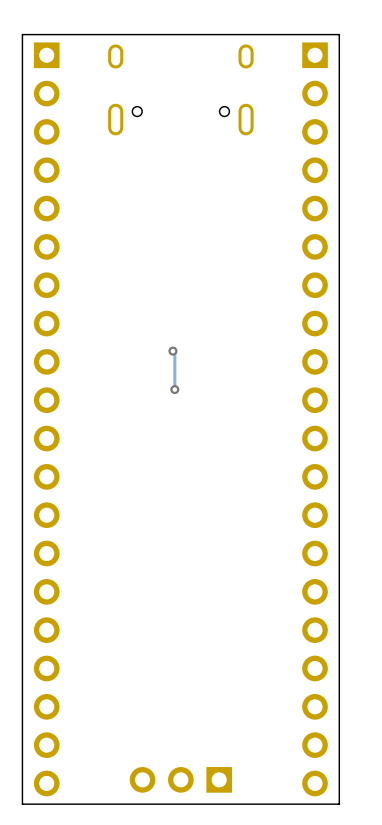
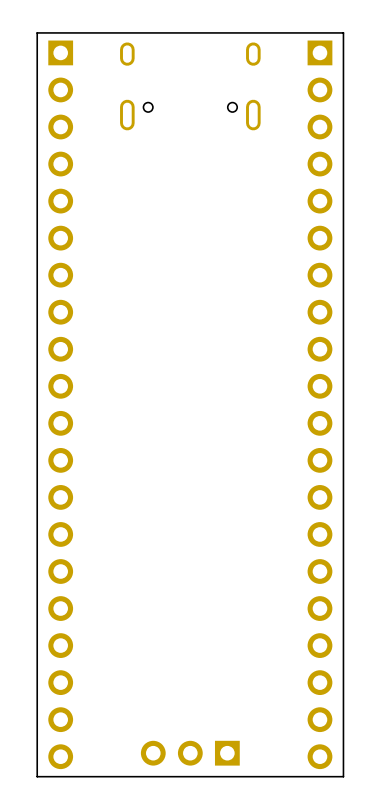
track: (172, 351) (174, 352) (174, 389) -> none
via: (172, 351) -> none
via: (174, 389) -> none

